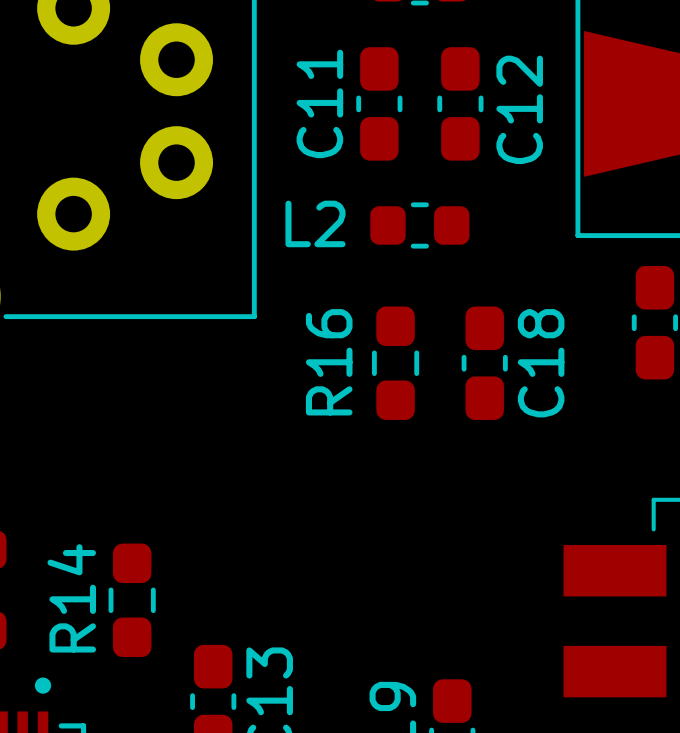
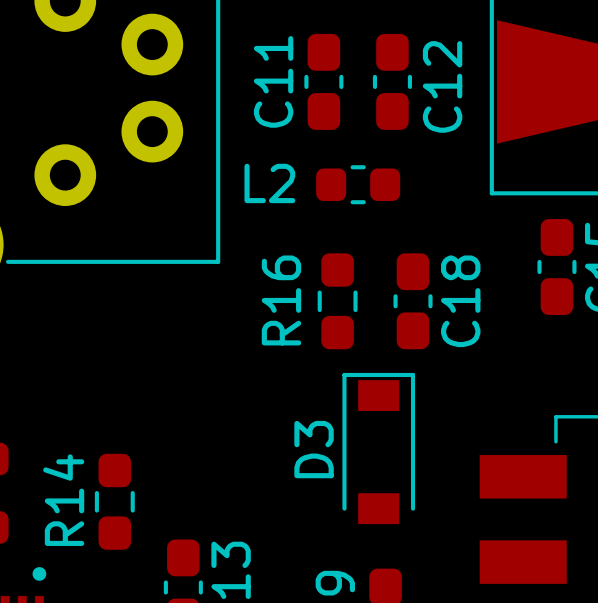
D3: none -> (378, 448)

